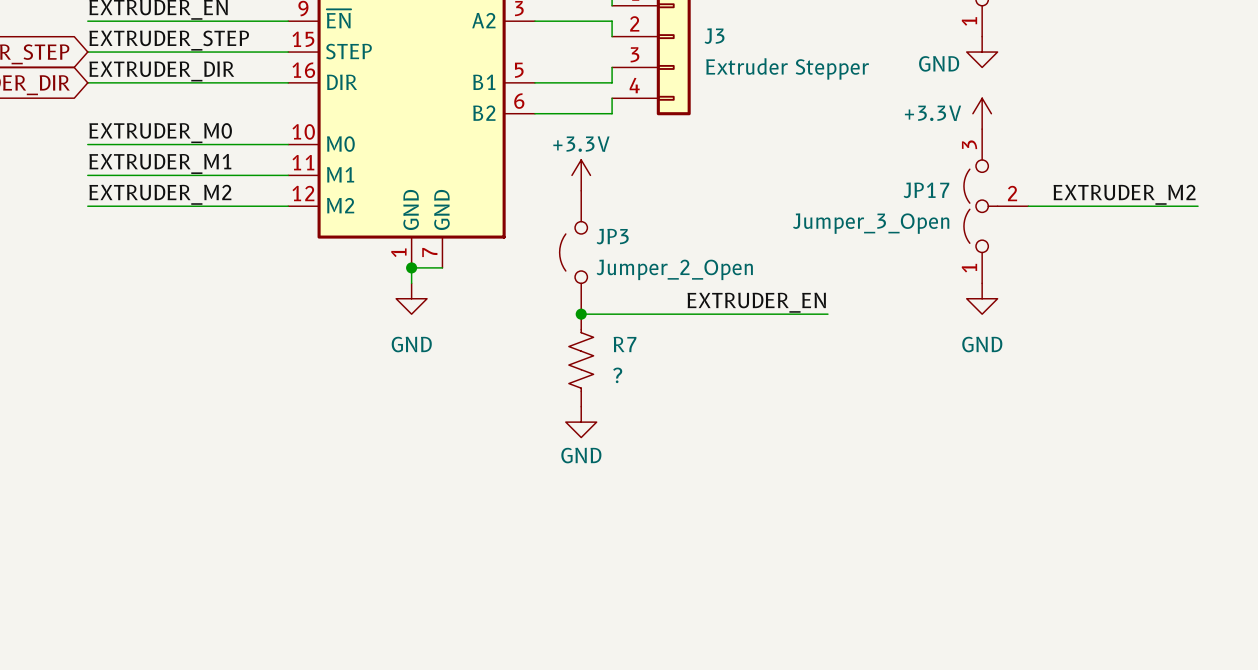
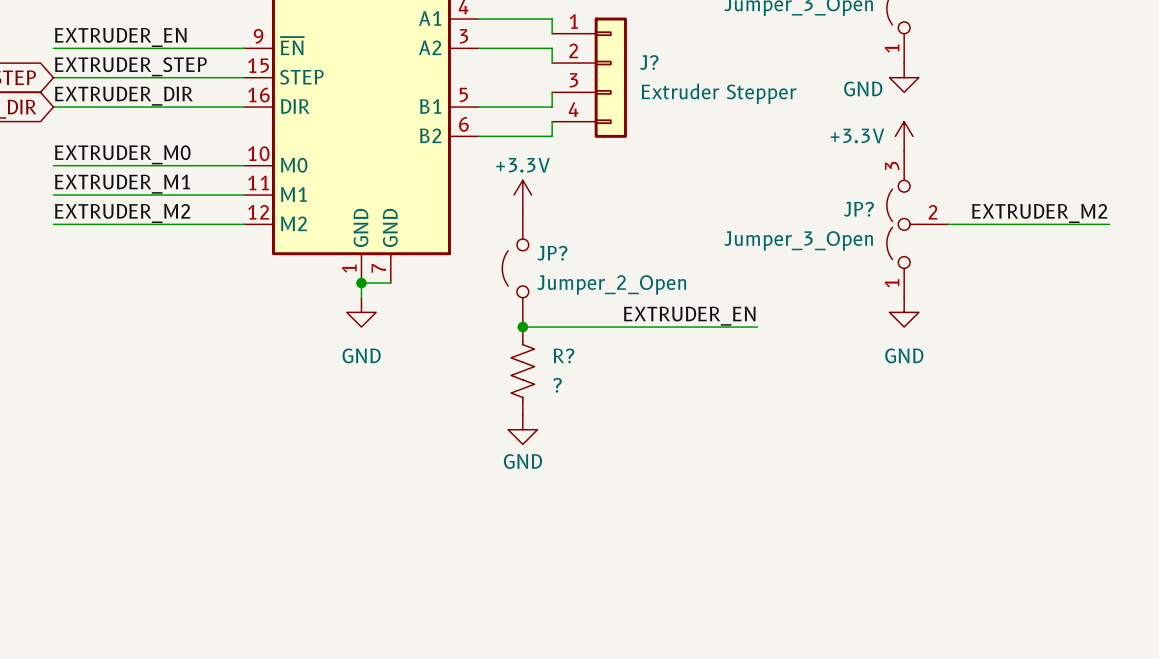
J3 name: J3 (714, 36) -> J? (649, 62)
JP17 name: JP17 (926, 190) -> JP? (858, 209)
JP3 name: JP3 (612, 236) -> JP? (552, 253)
R7 name: R7 (625, 344) -> R? (563, 355)

